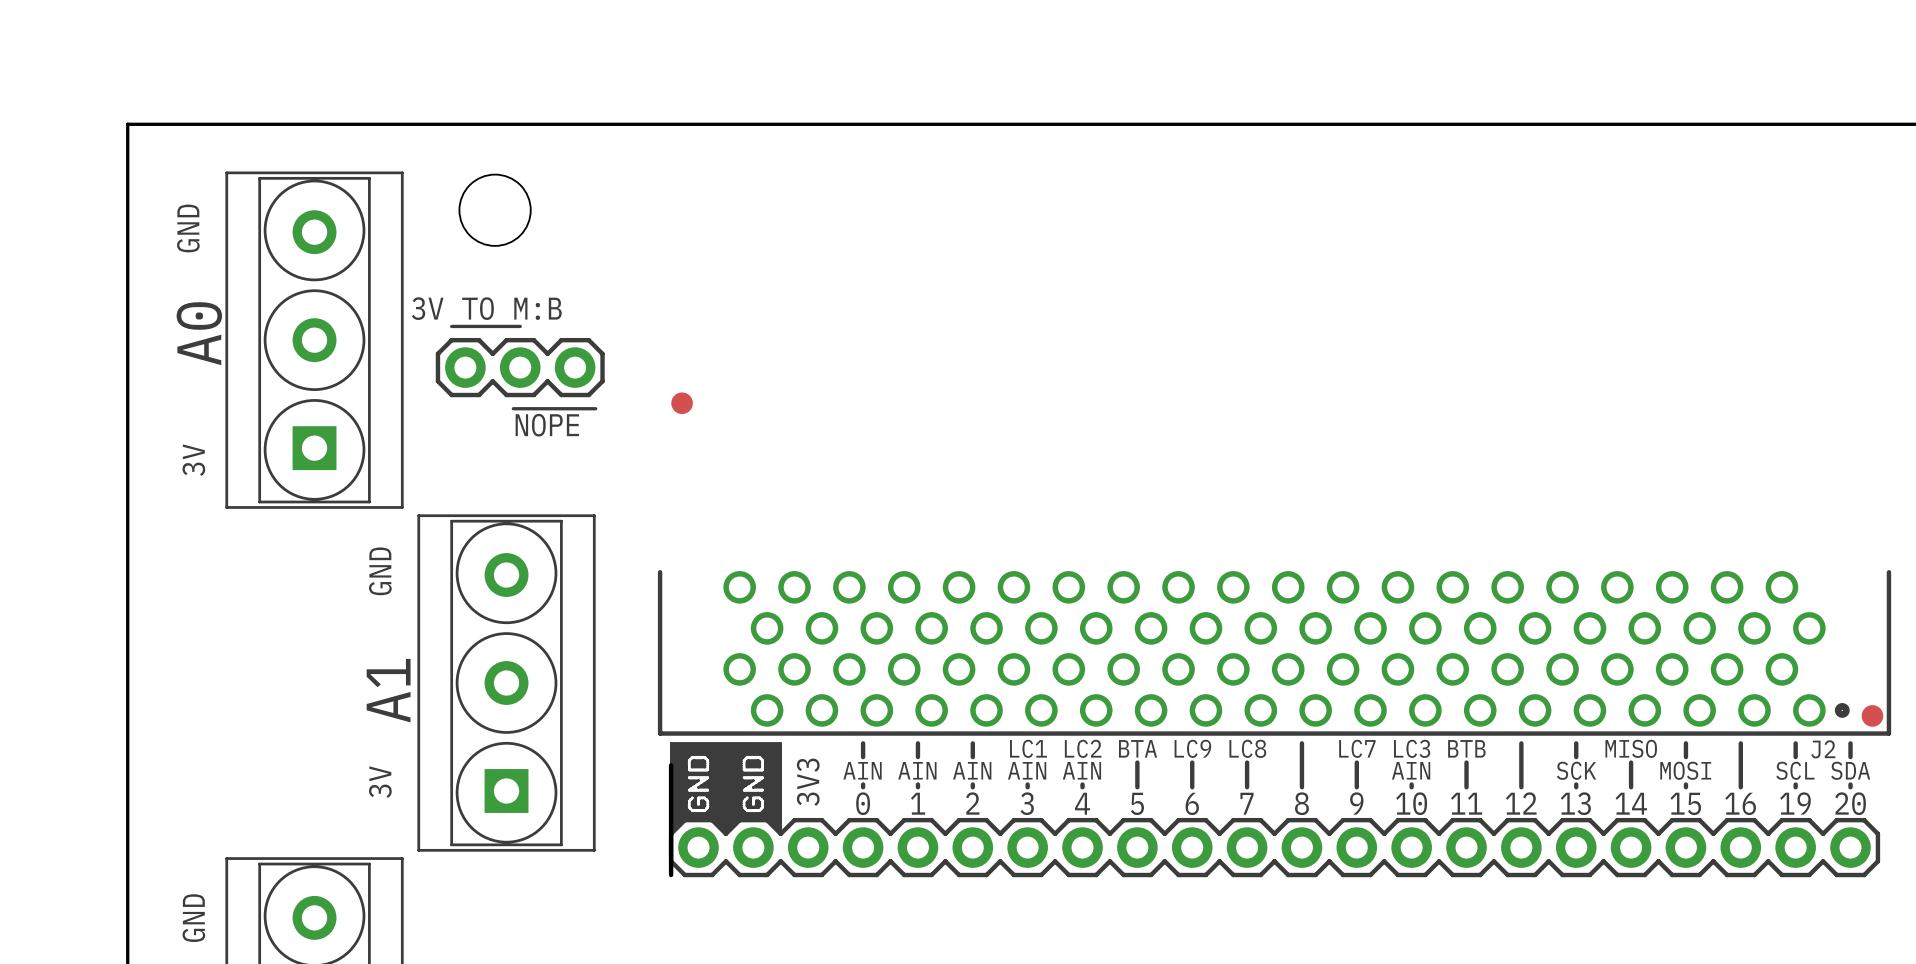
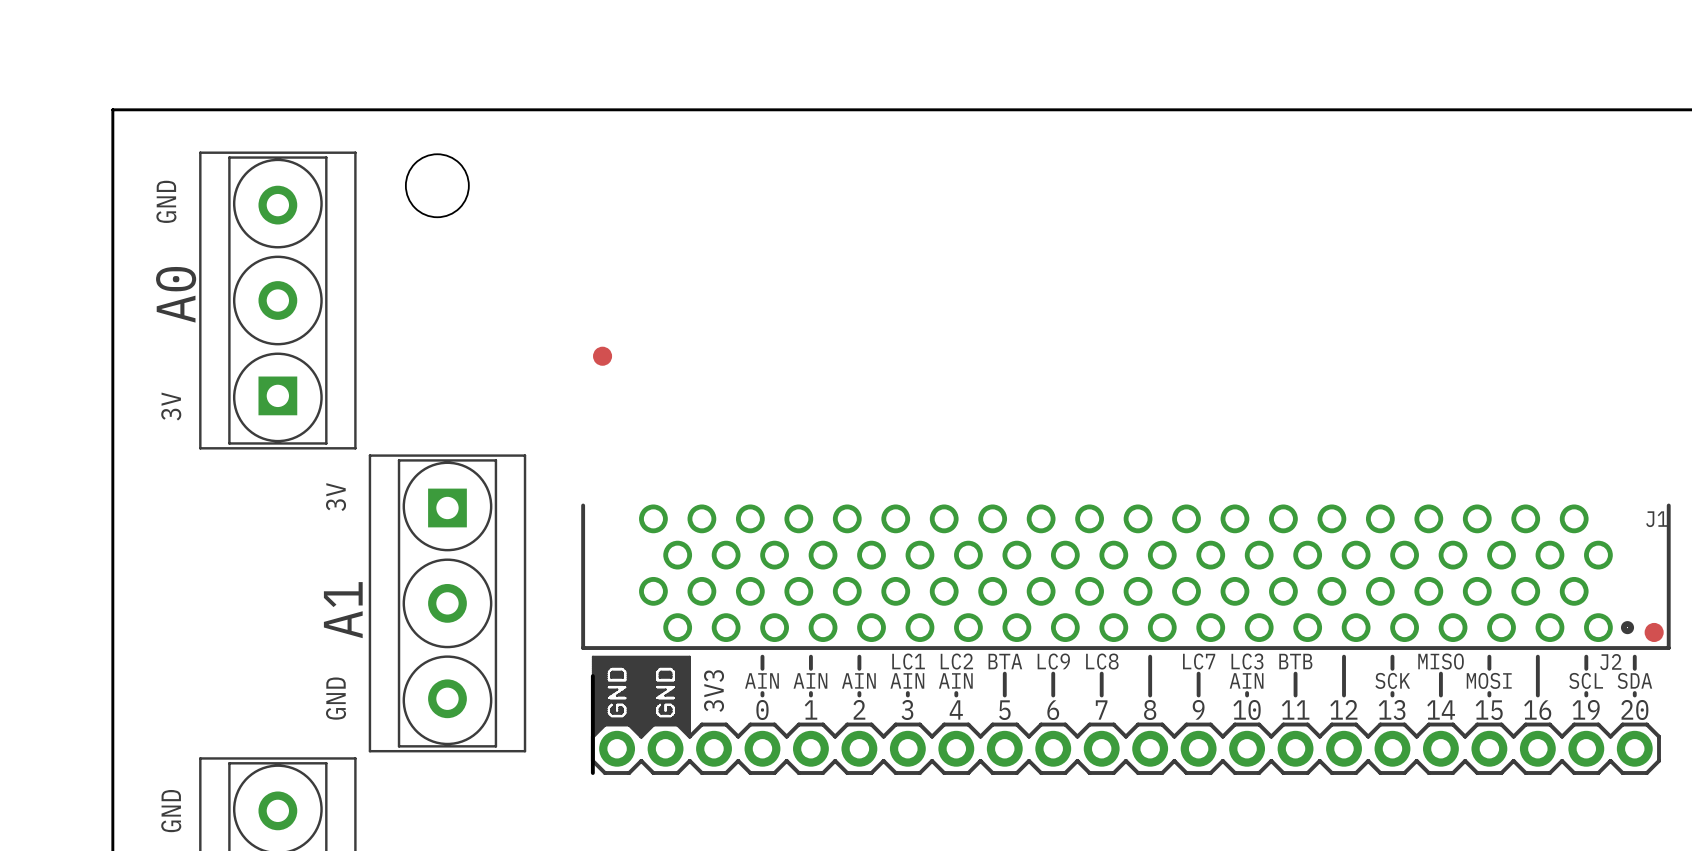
text: 3V TO M:B (486, 308) -> none
line: (451, 326) (520, 326) -> none
part: (520, 367) -> none
line: (513, 408) (595, 408) -> none
text: NOPE (547, 425) -> none
text: GND (380, 571) -> 3V (336, 497)
J1 name: none -> J1 (1656, 519)
part rotation: 0° (506, 683) -> 180° (447, 603)
text: 3V (380, 782) -> GND (336, 698)

